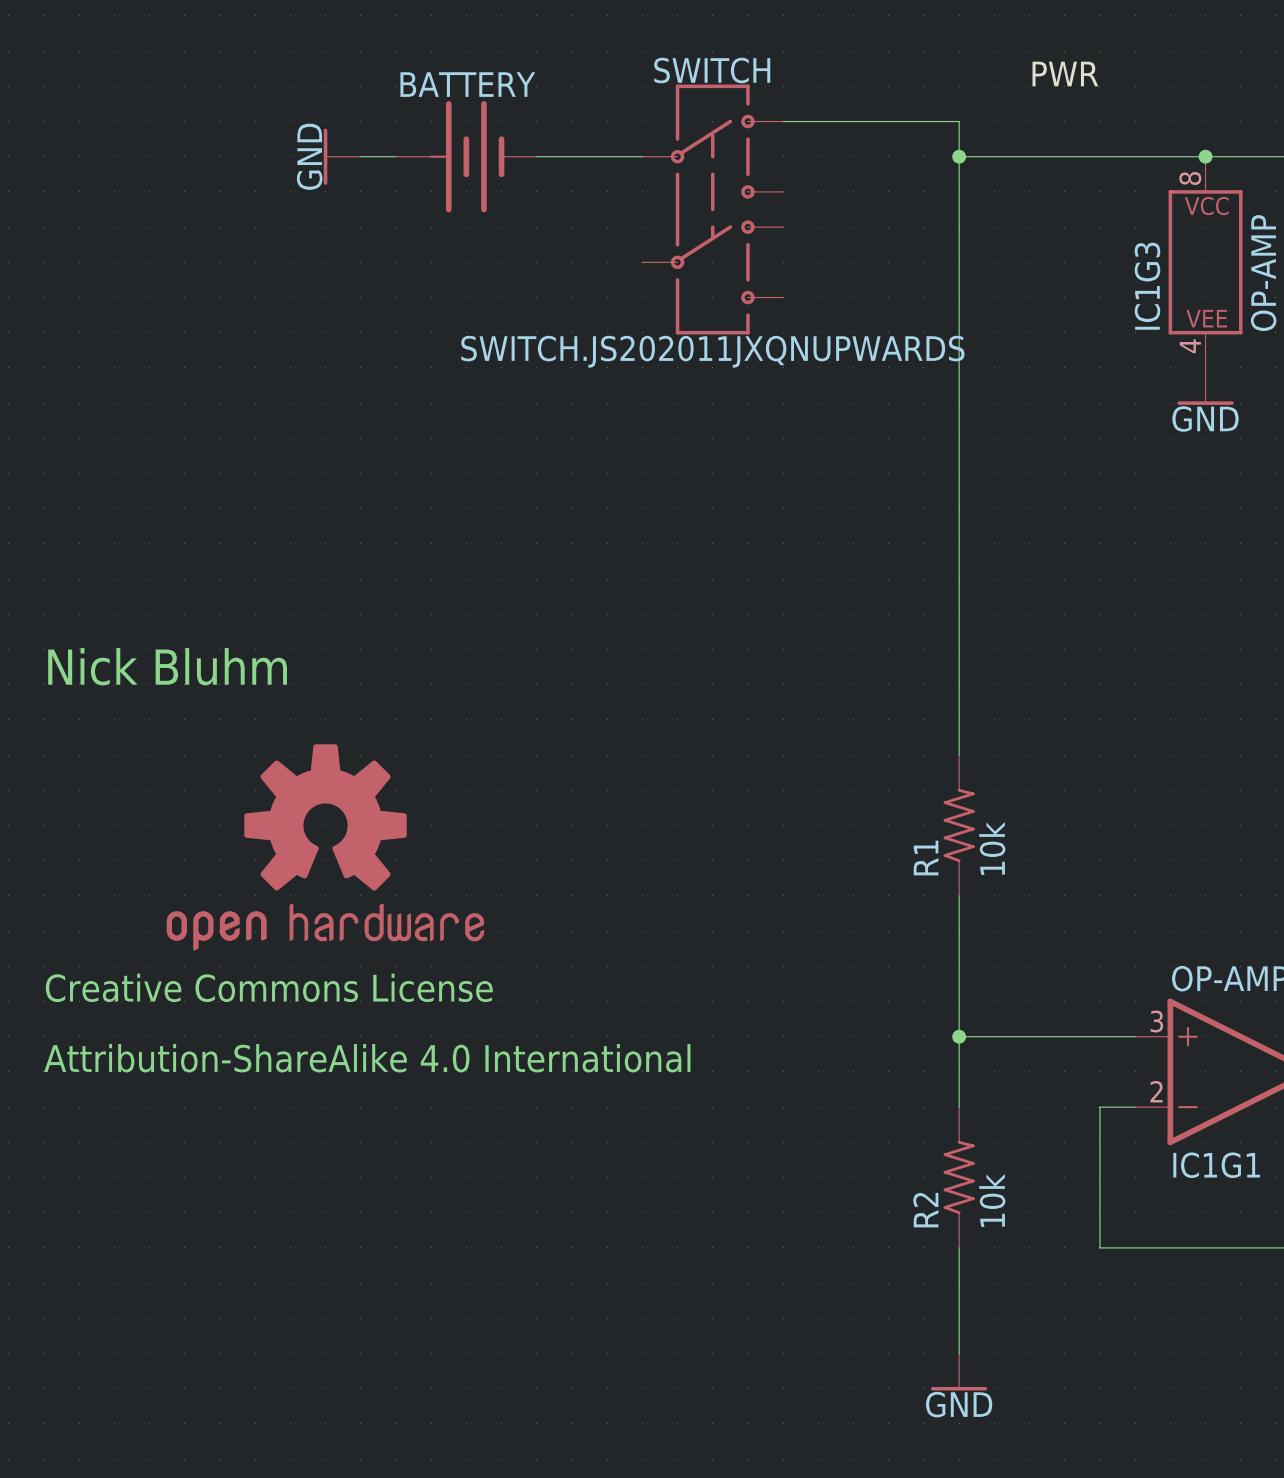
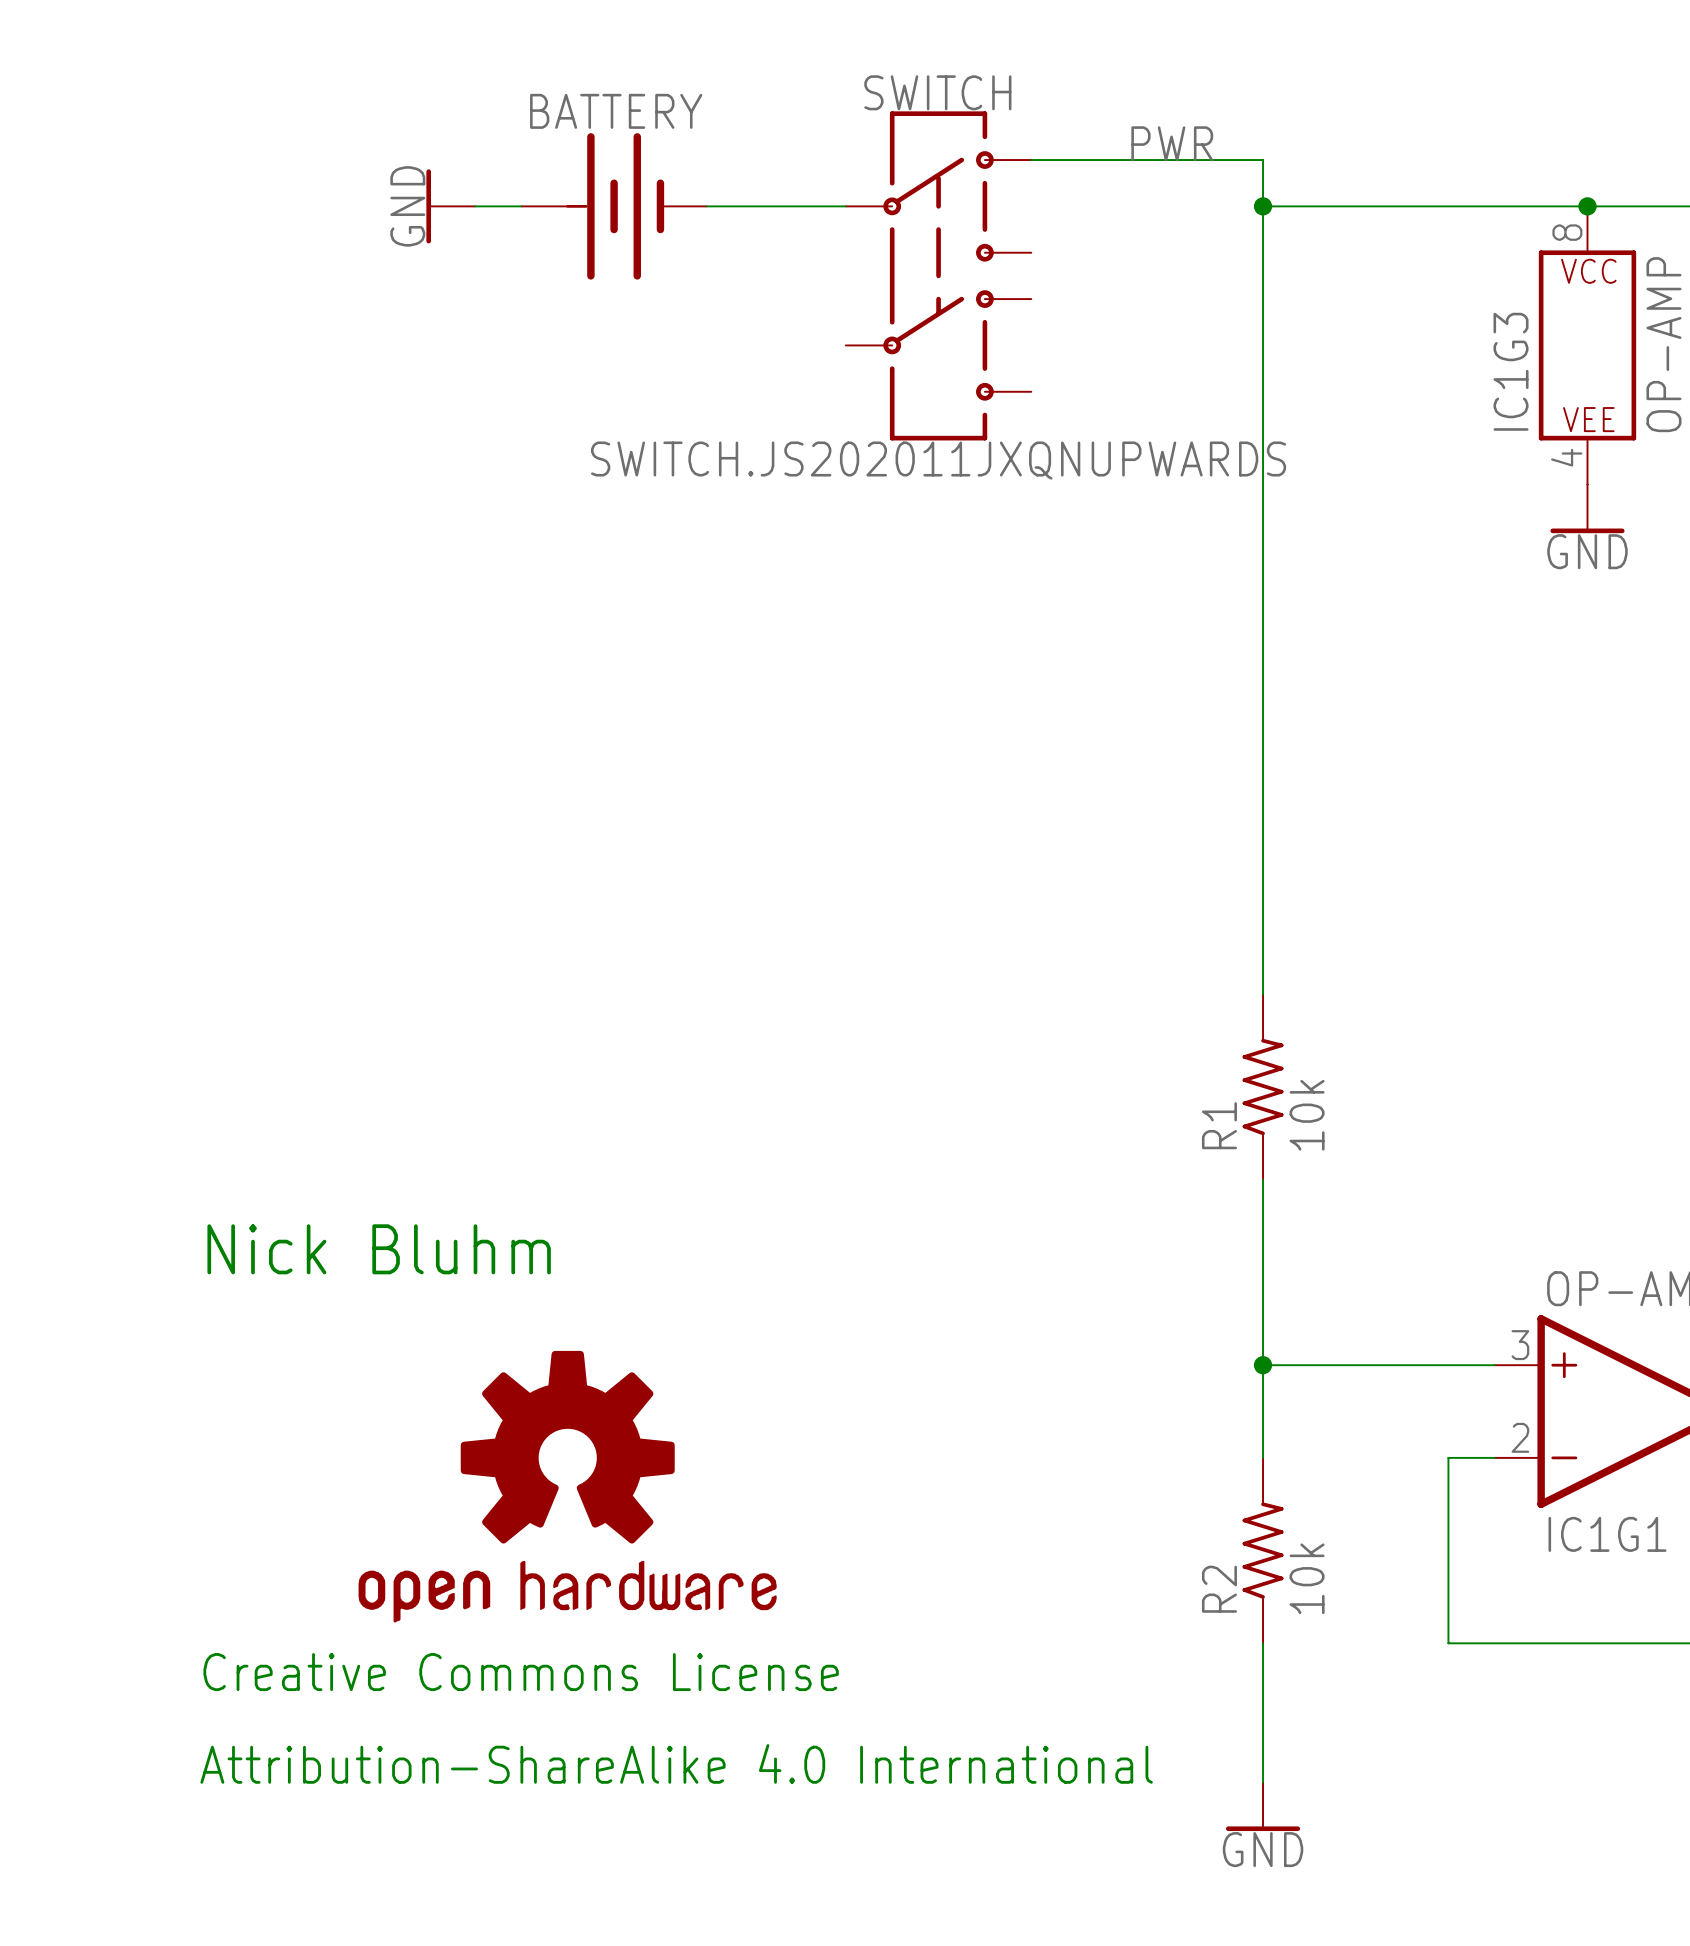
label position: PWR (1065, 74) -> PWR (1172, 143)
text position: Nick Bluhm (167, 666) -> Nick Bluhm (379, 1249)
part position: (325, 847) -> (567, 1486)
text position: Creative Commons License (269, 987) -> Creative Commons License (521, 1672)
text position: Attribution-ShareAlike 4.0 International (367, 1058) -> Attribution-ShareAlike 4.0 International (676, 1763)

